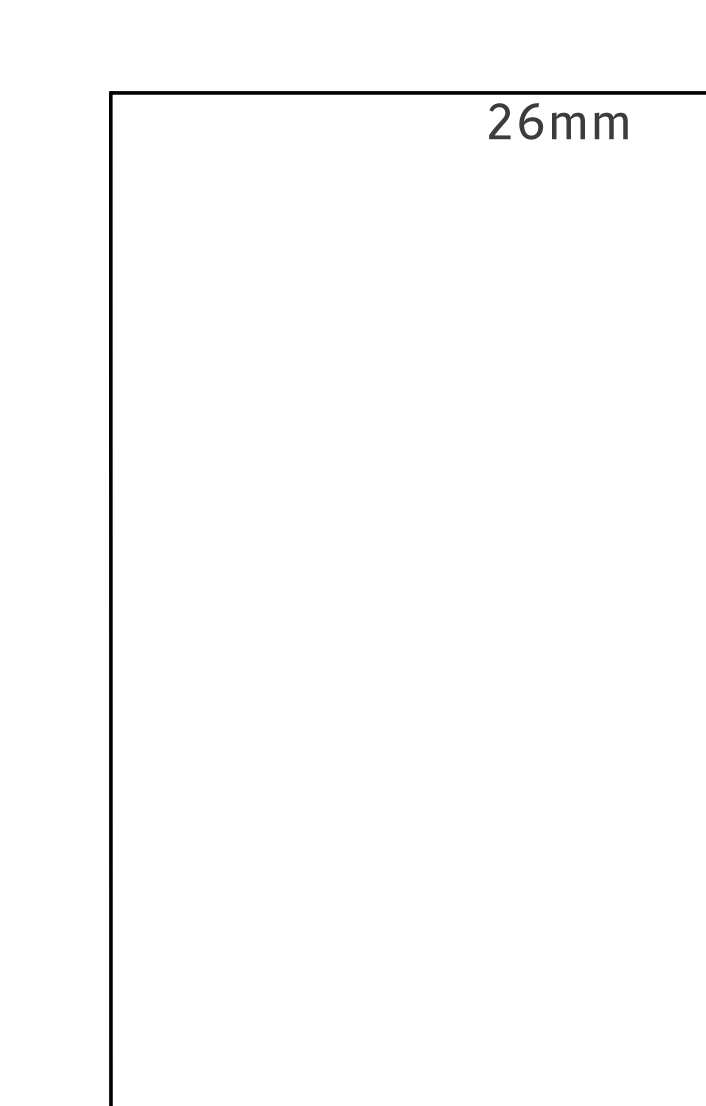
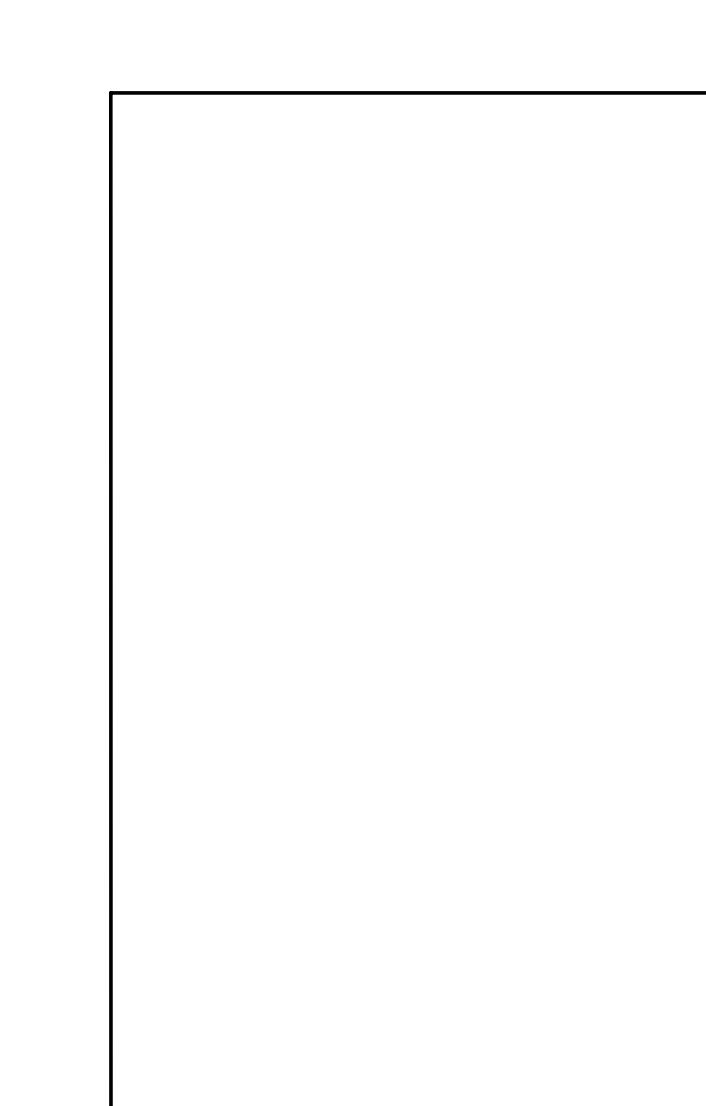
text: 26mm (558, 121) -> none

